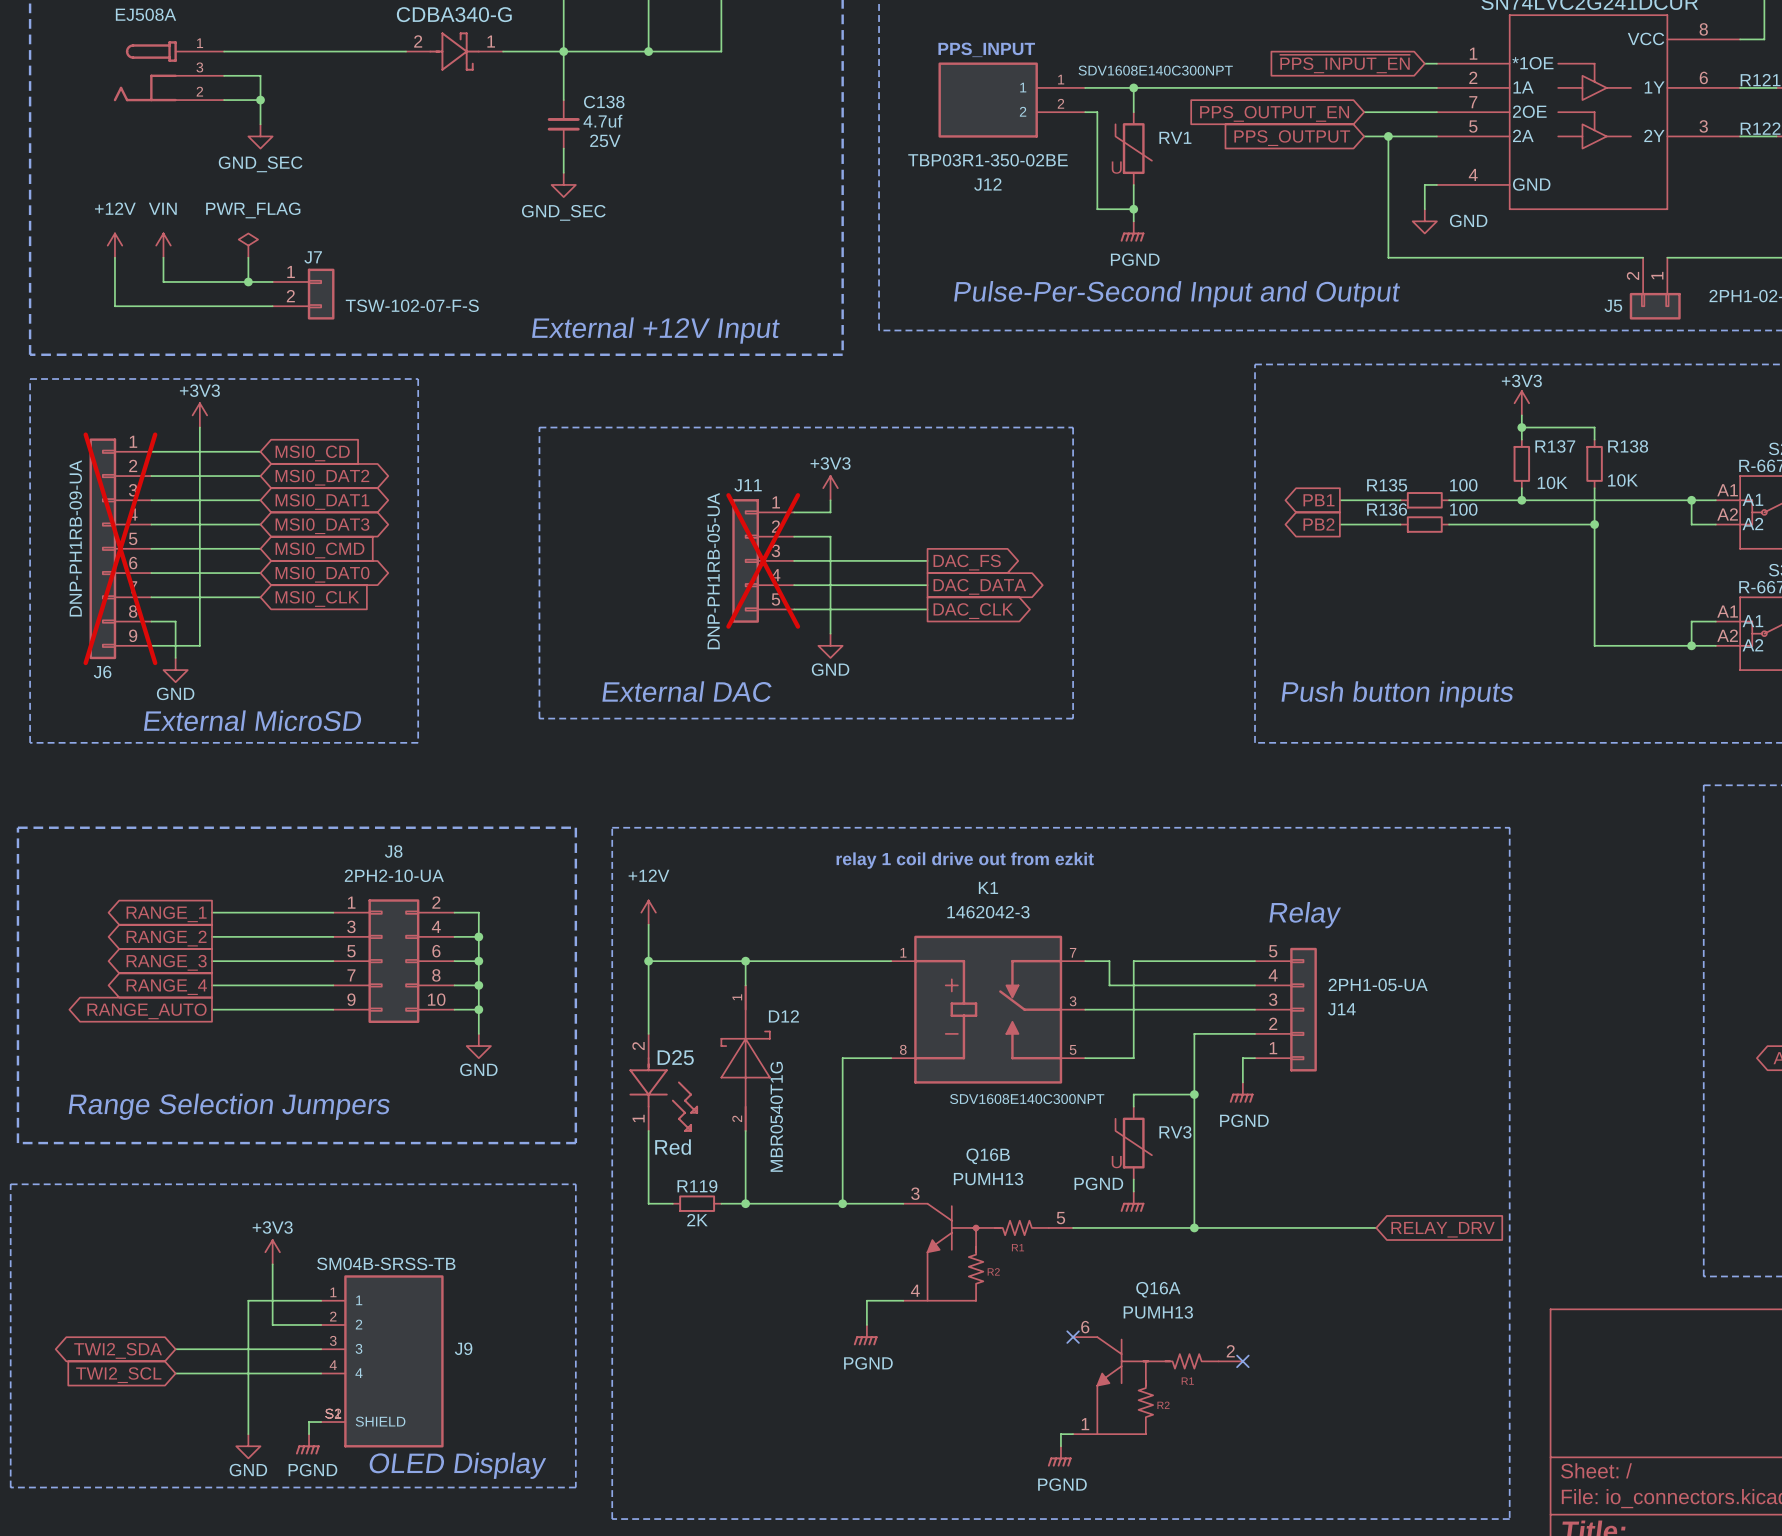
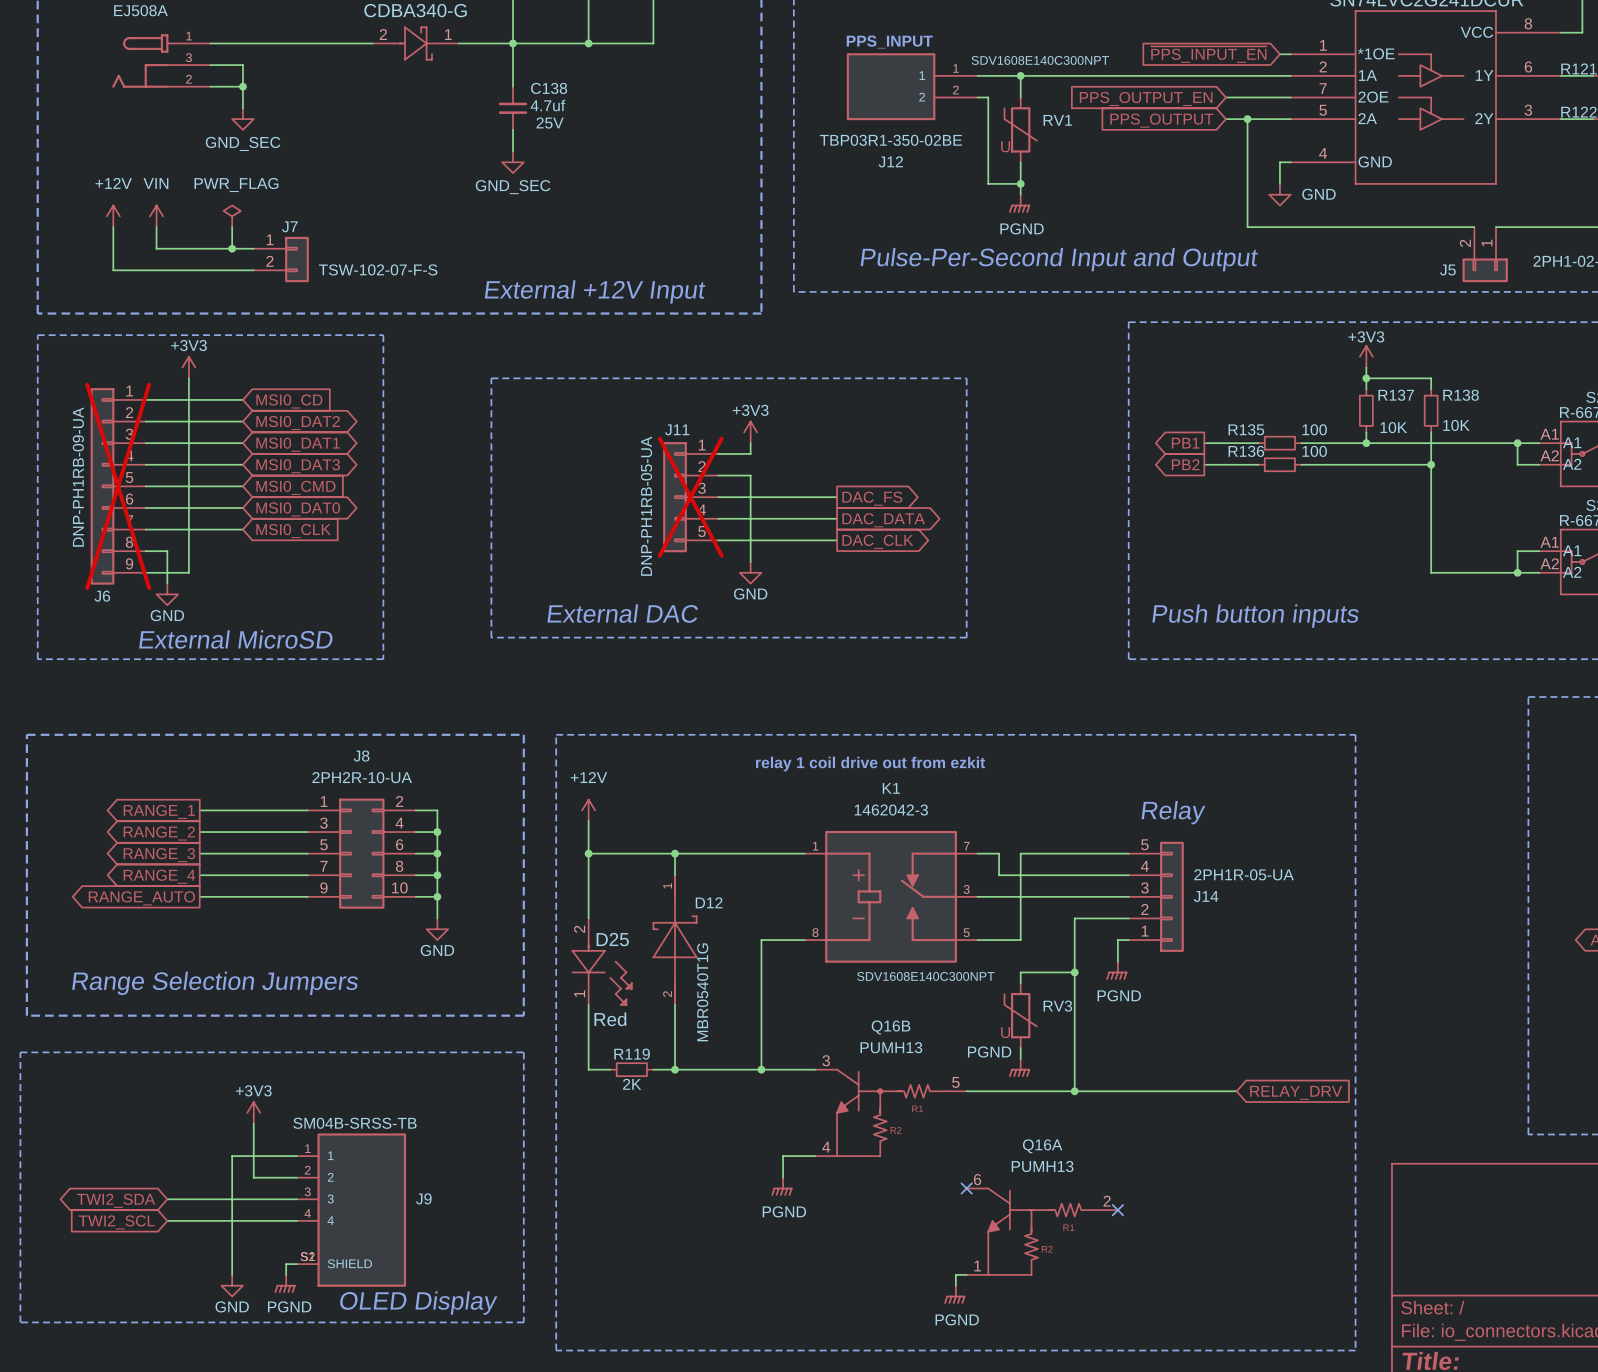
J8 value: 2PH2-10-UA (394, 875) -> 2PH2R-10-UA (362, 777)
J14 value: 2PH1-05-UA (1378, 984) -> 2PH1R-05-UA (1244, 874)

